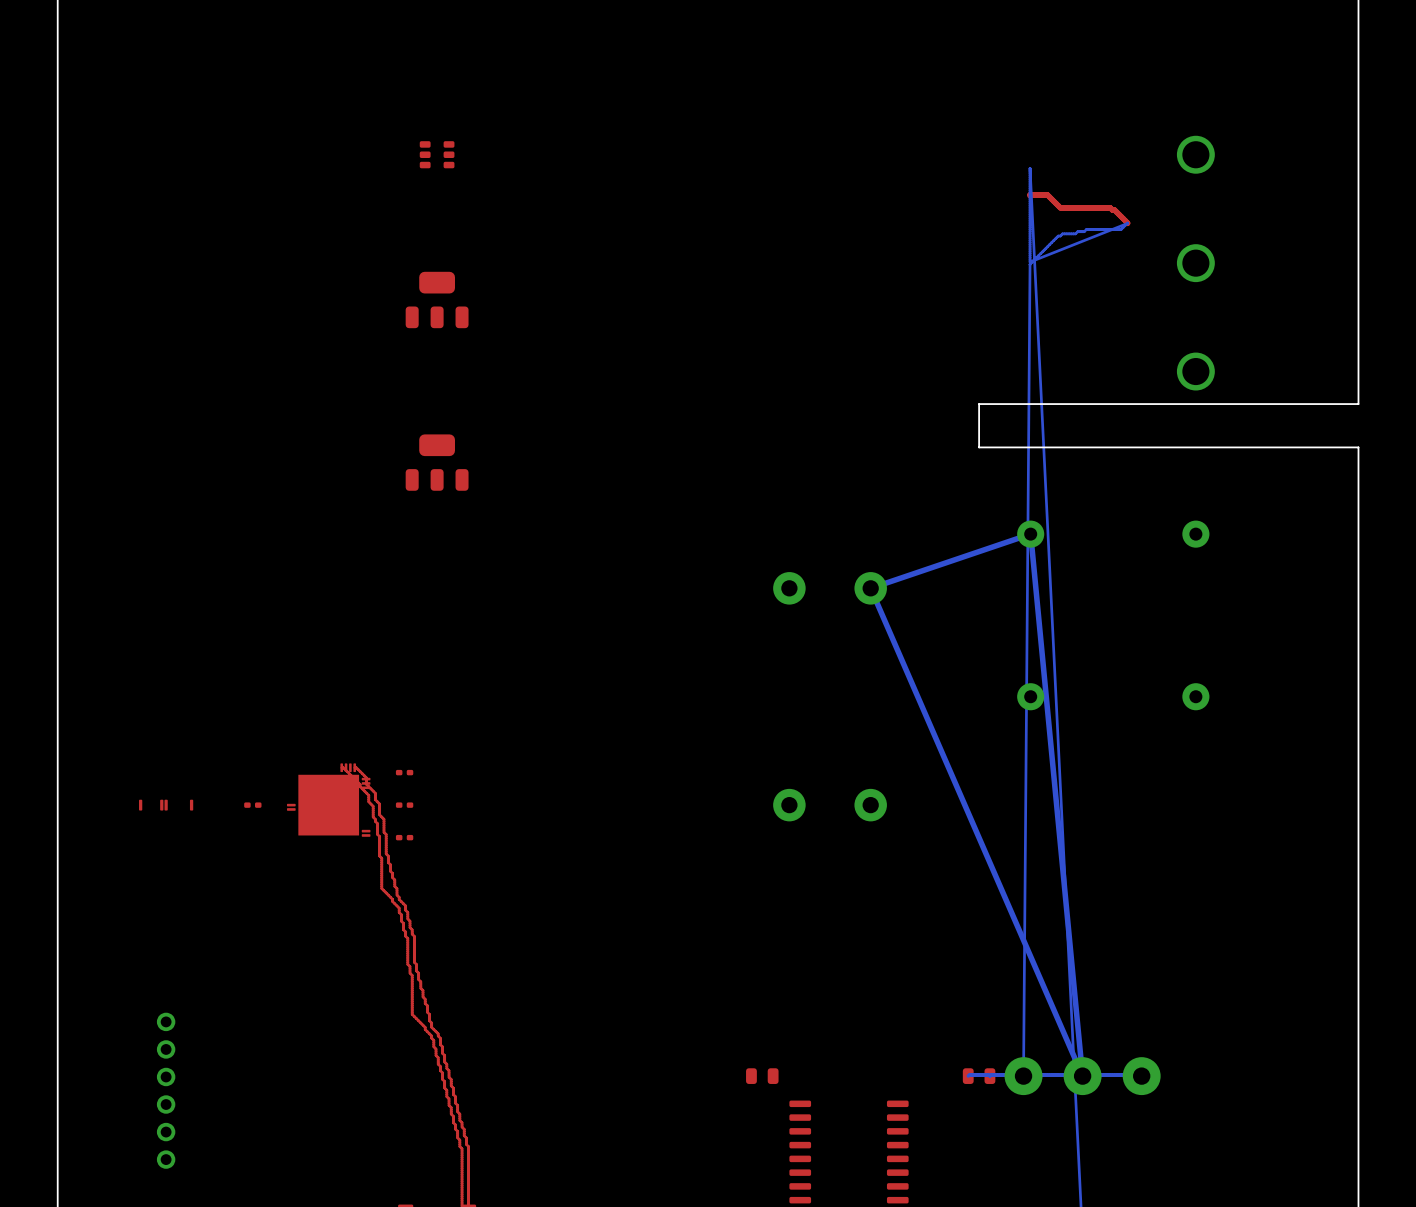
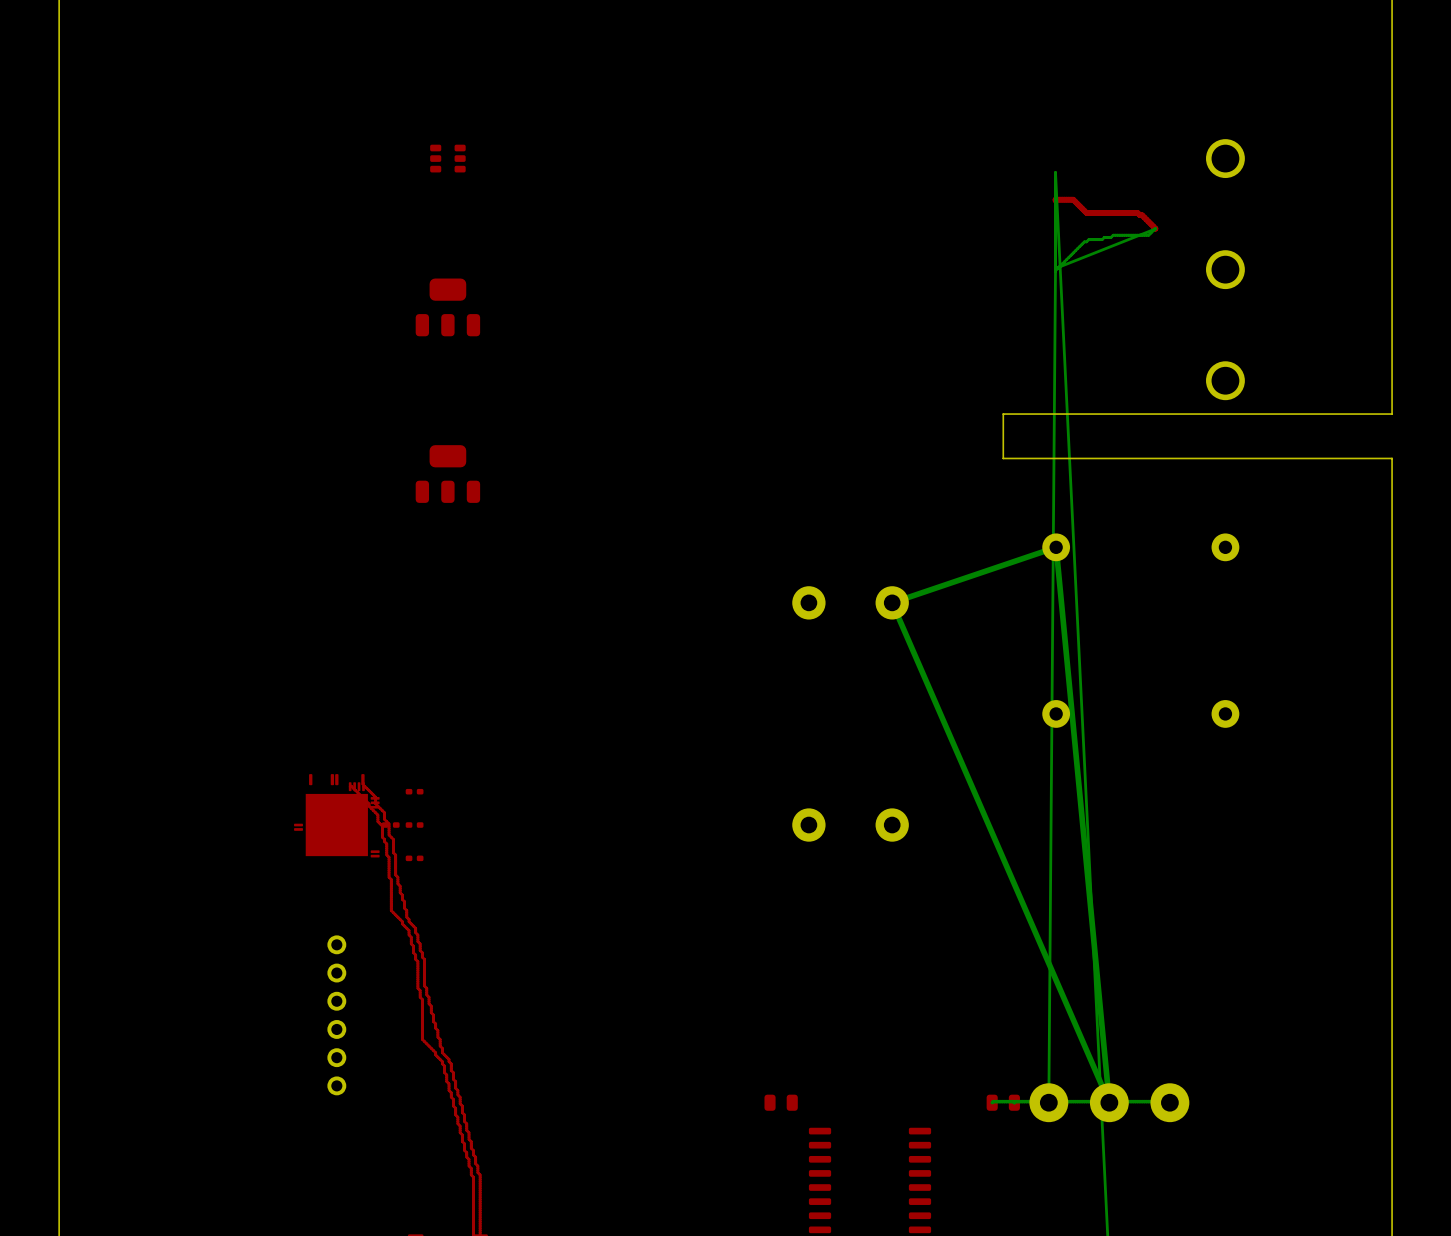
part position: (166, 805) -> (336, 779)
part position: (252, 805) -> (390, 825)
part position: (166, 1090) -> (336, 1015)

